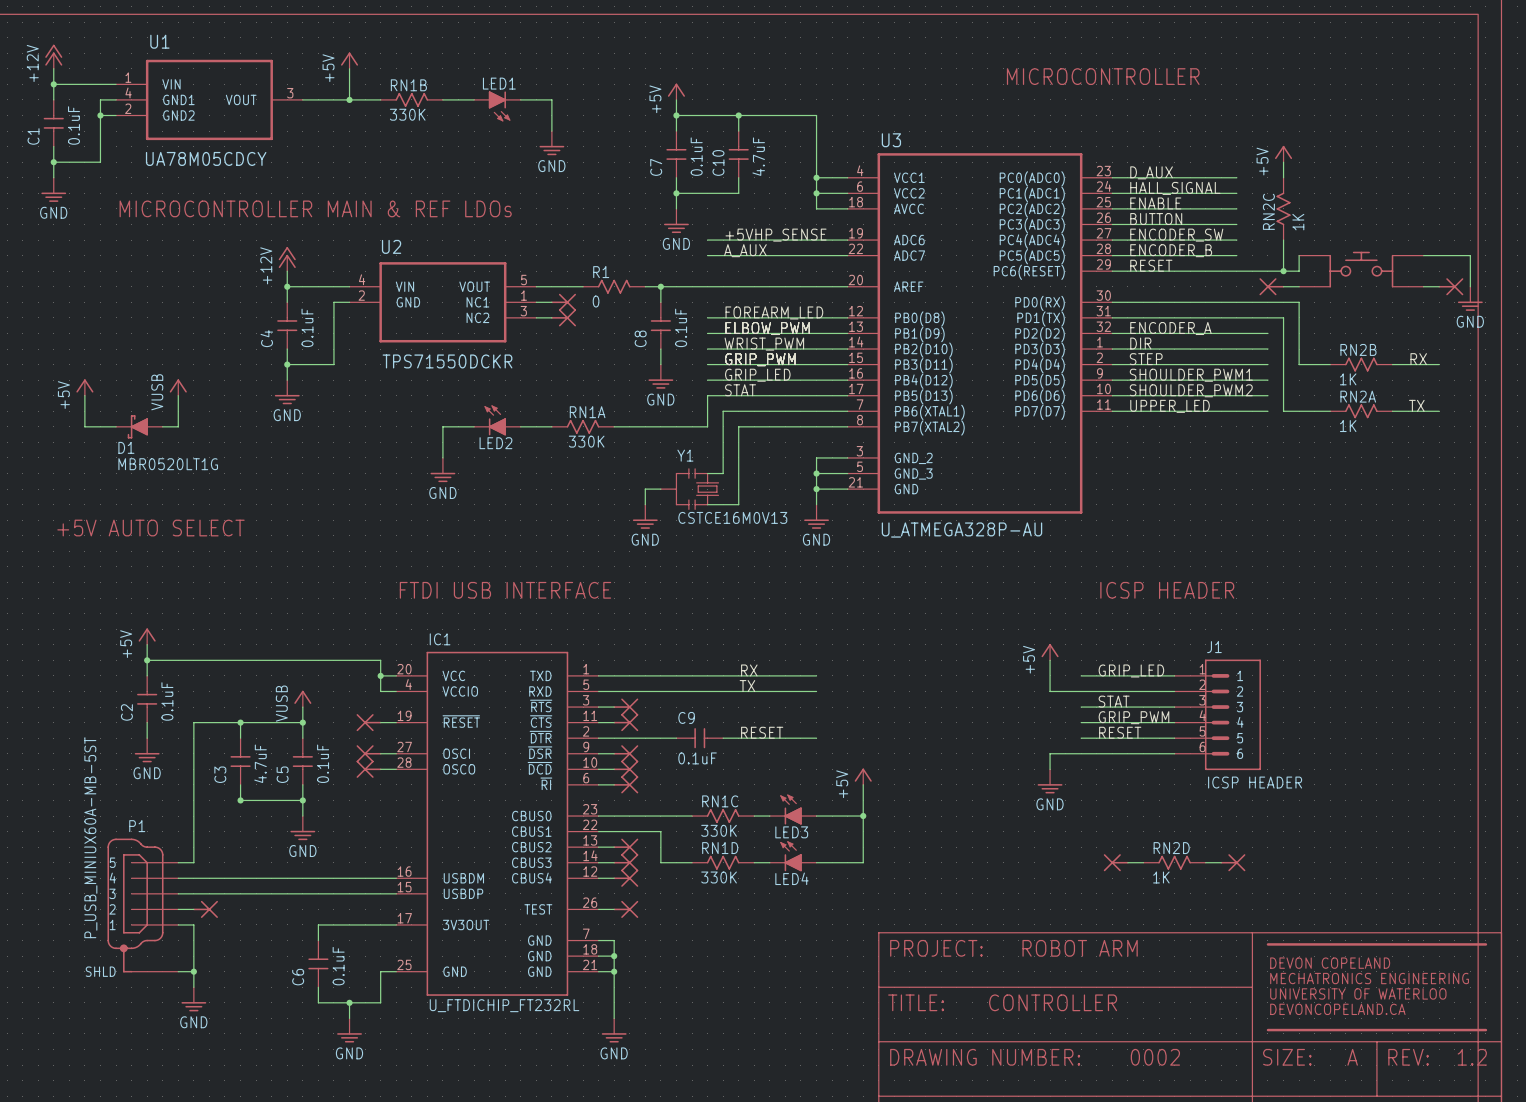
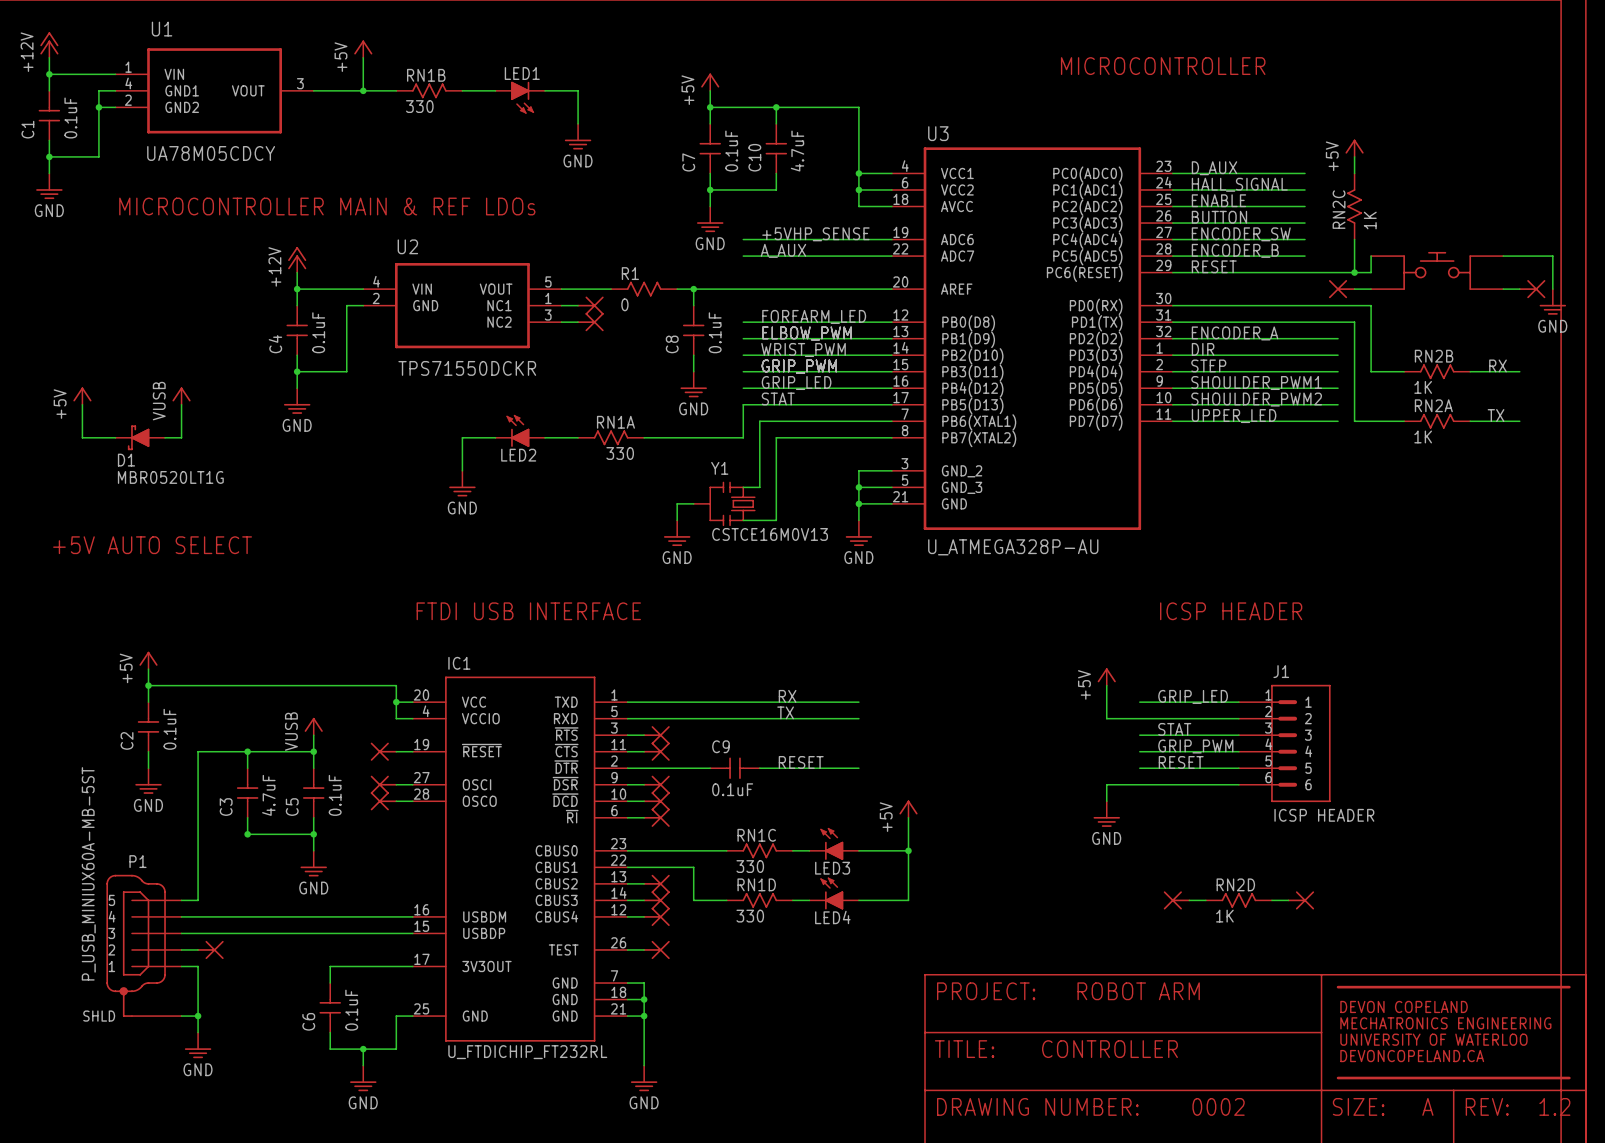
RN1B value: 330K (407, 114) -> 330 (419, 106)
RN1A value: 330K (586, 441) -> 330 (620, 453)
RN1C value: 330K (719, 830) -> 330 (750, 866)
RN1D value: 330K (719, 877) -> 330 (750, 916)

